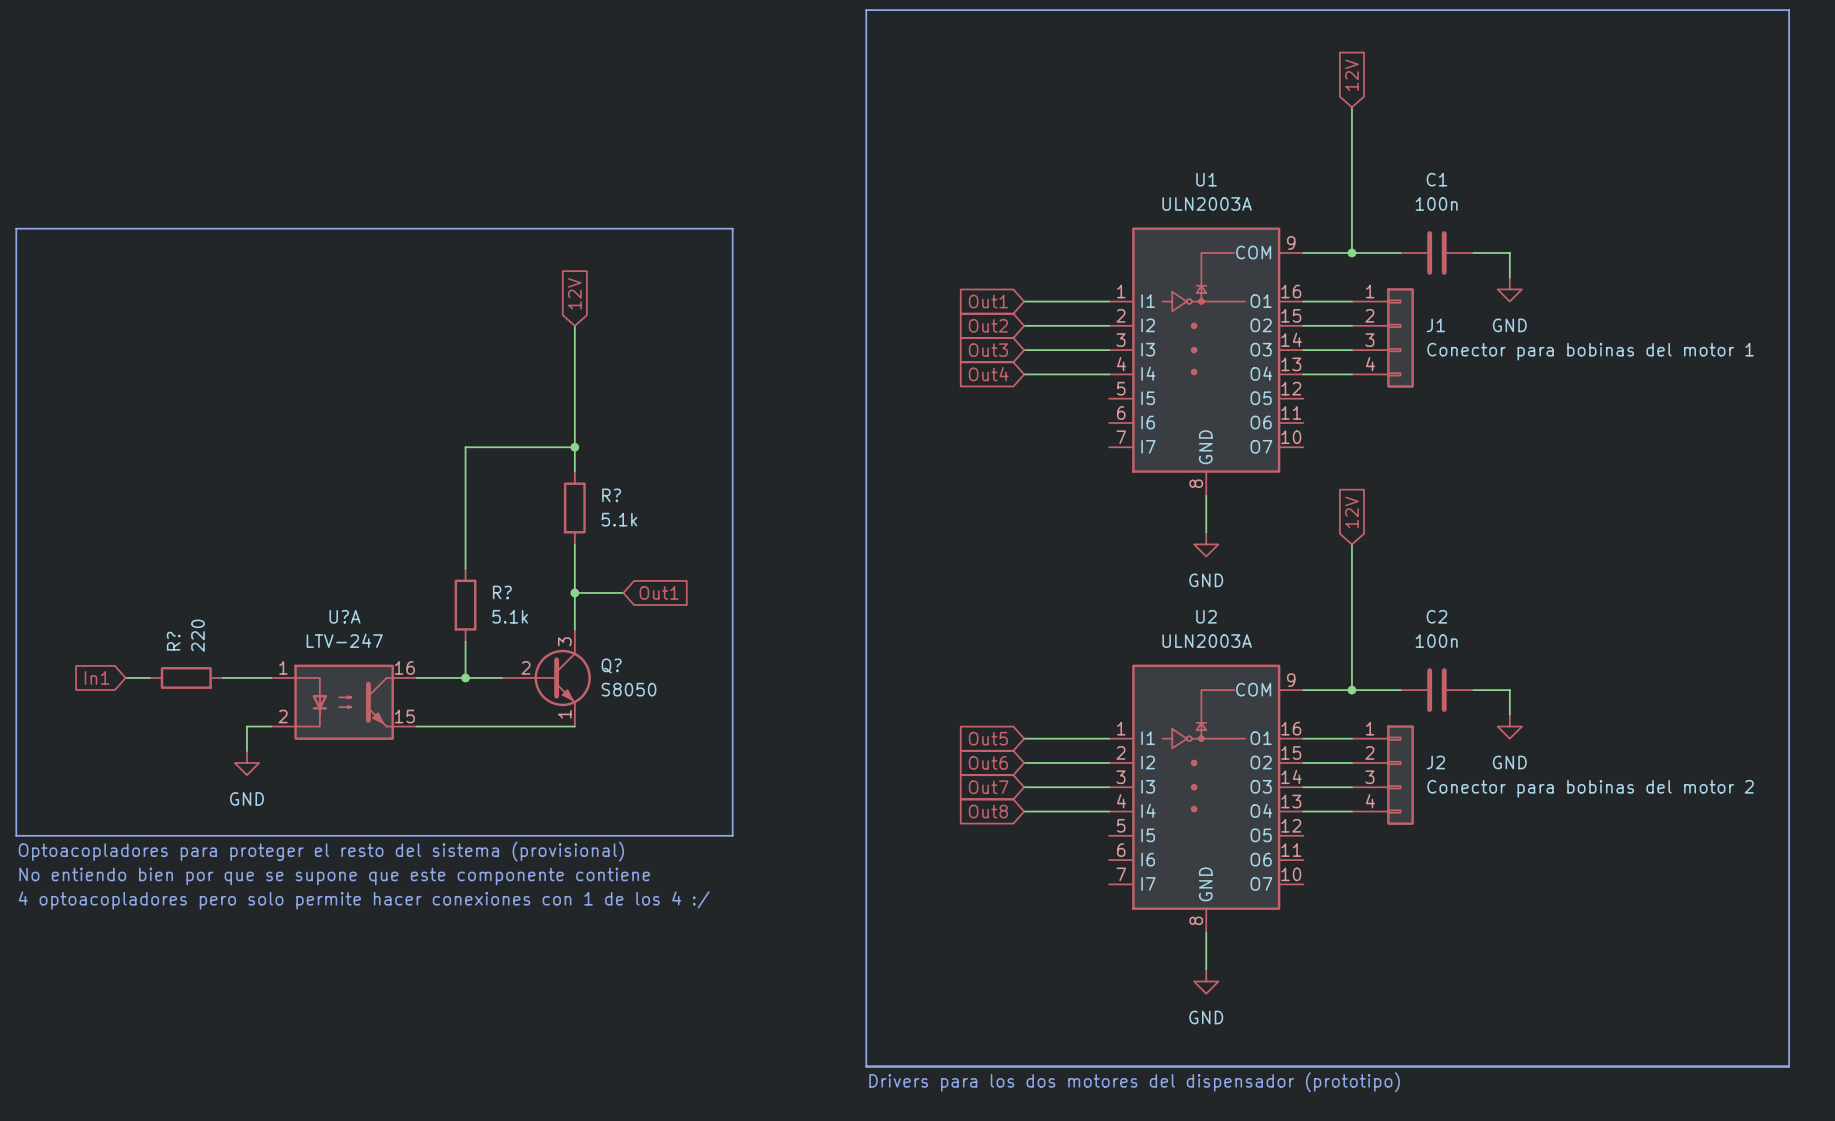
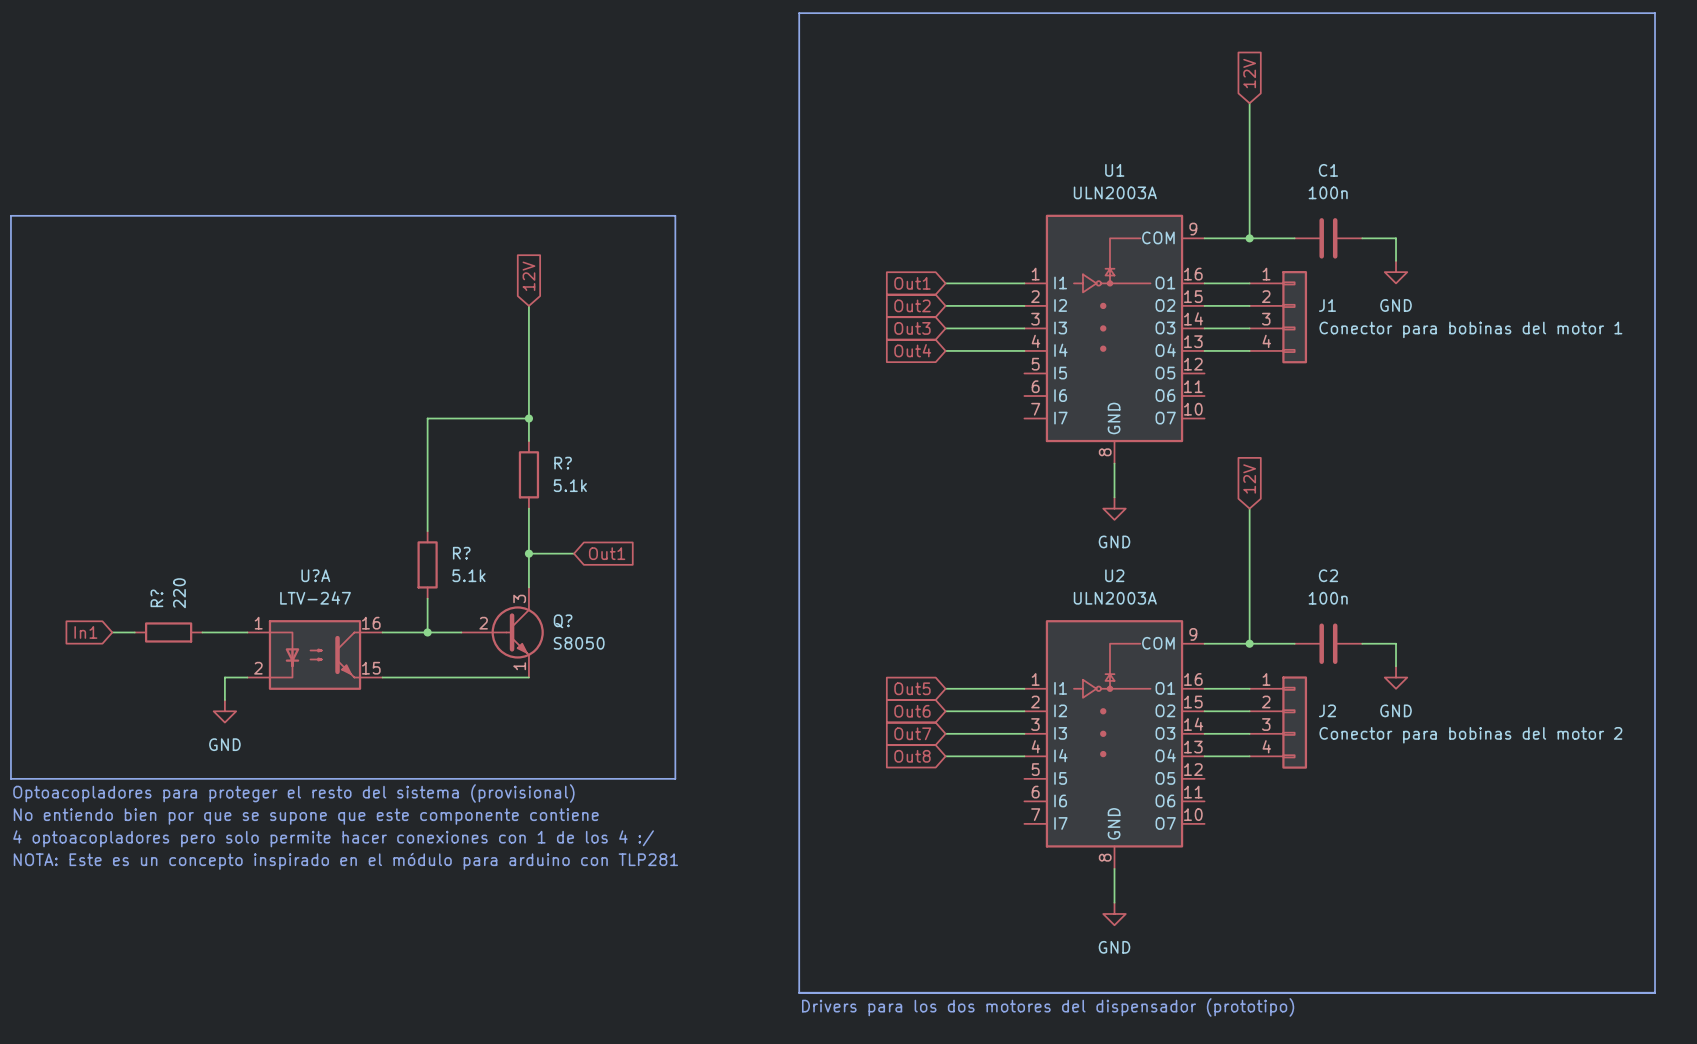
text: none -> NOTA: Este es un concepto inspirado en el módulo para arduino con TLP281 (345, 861)

